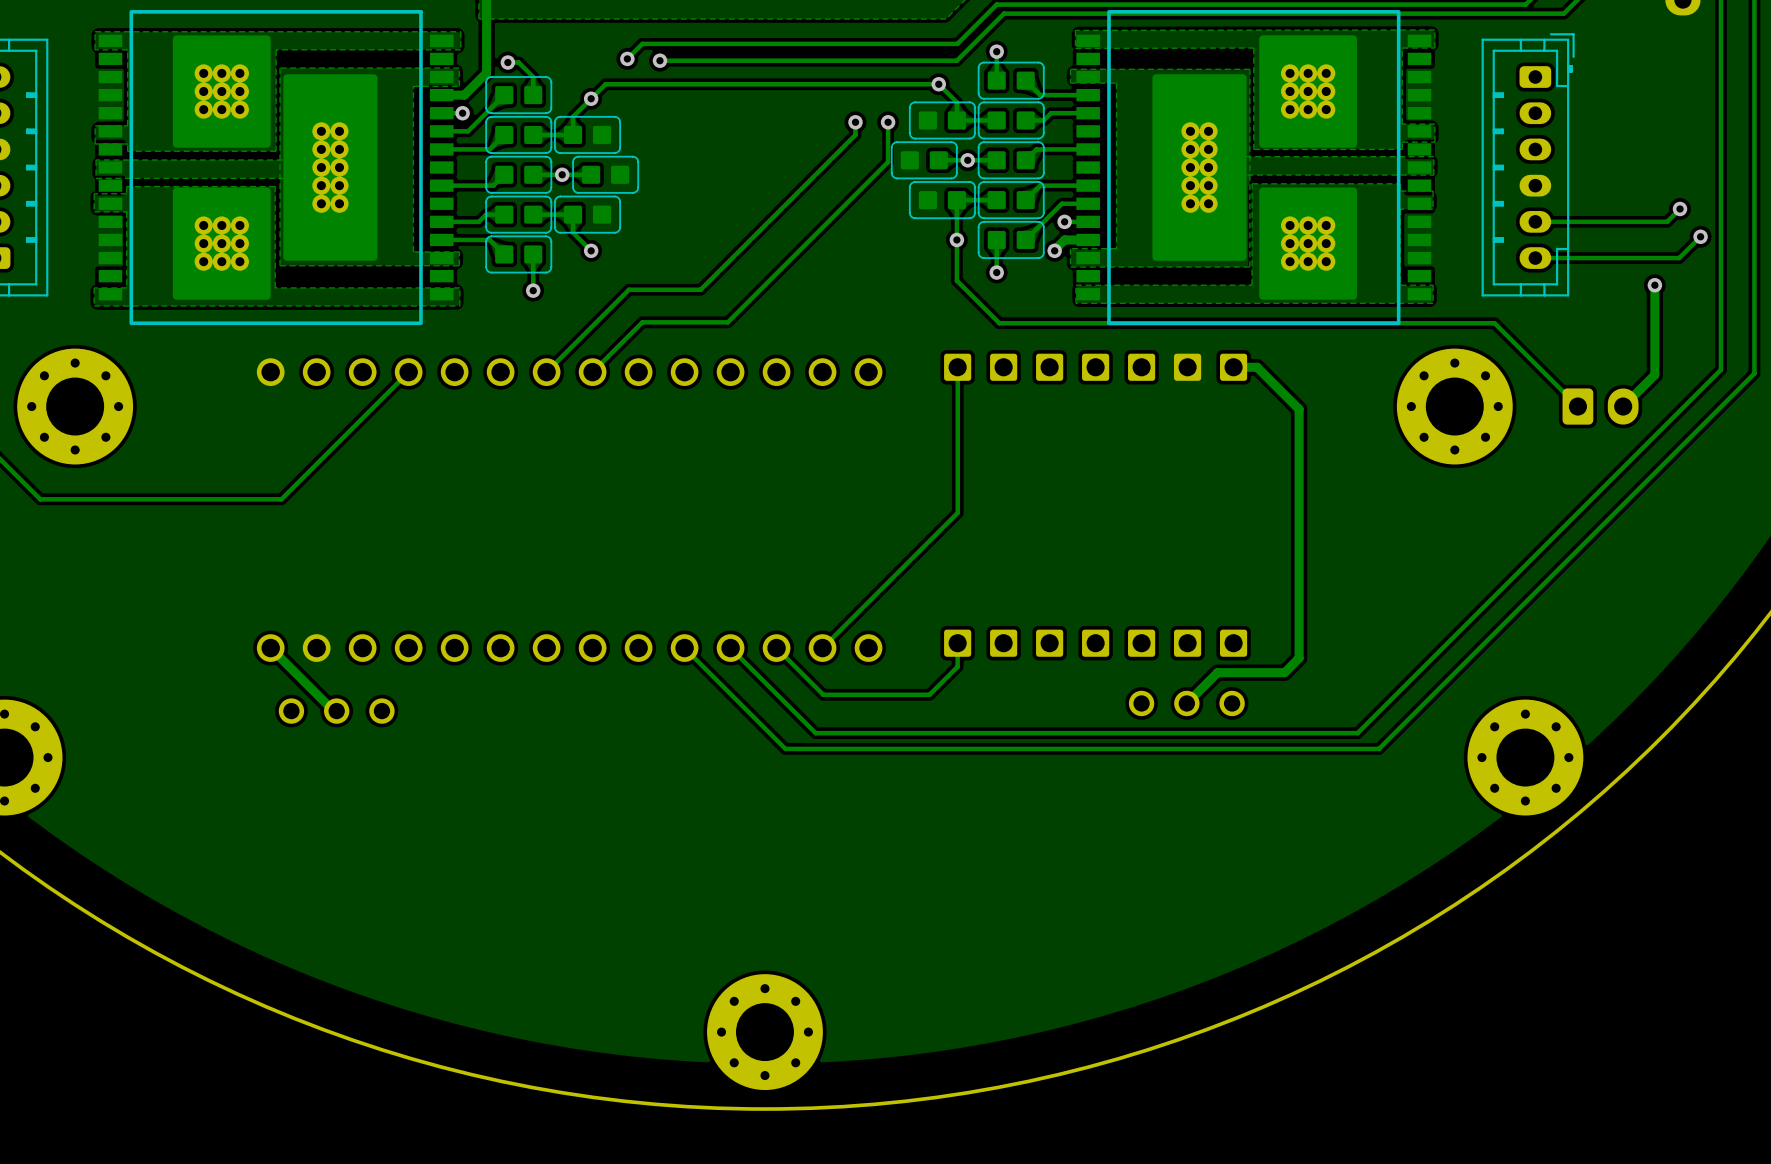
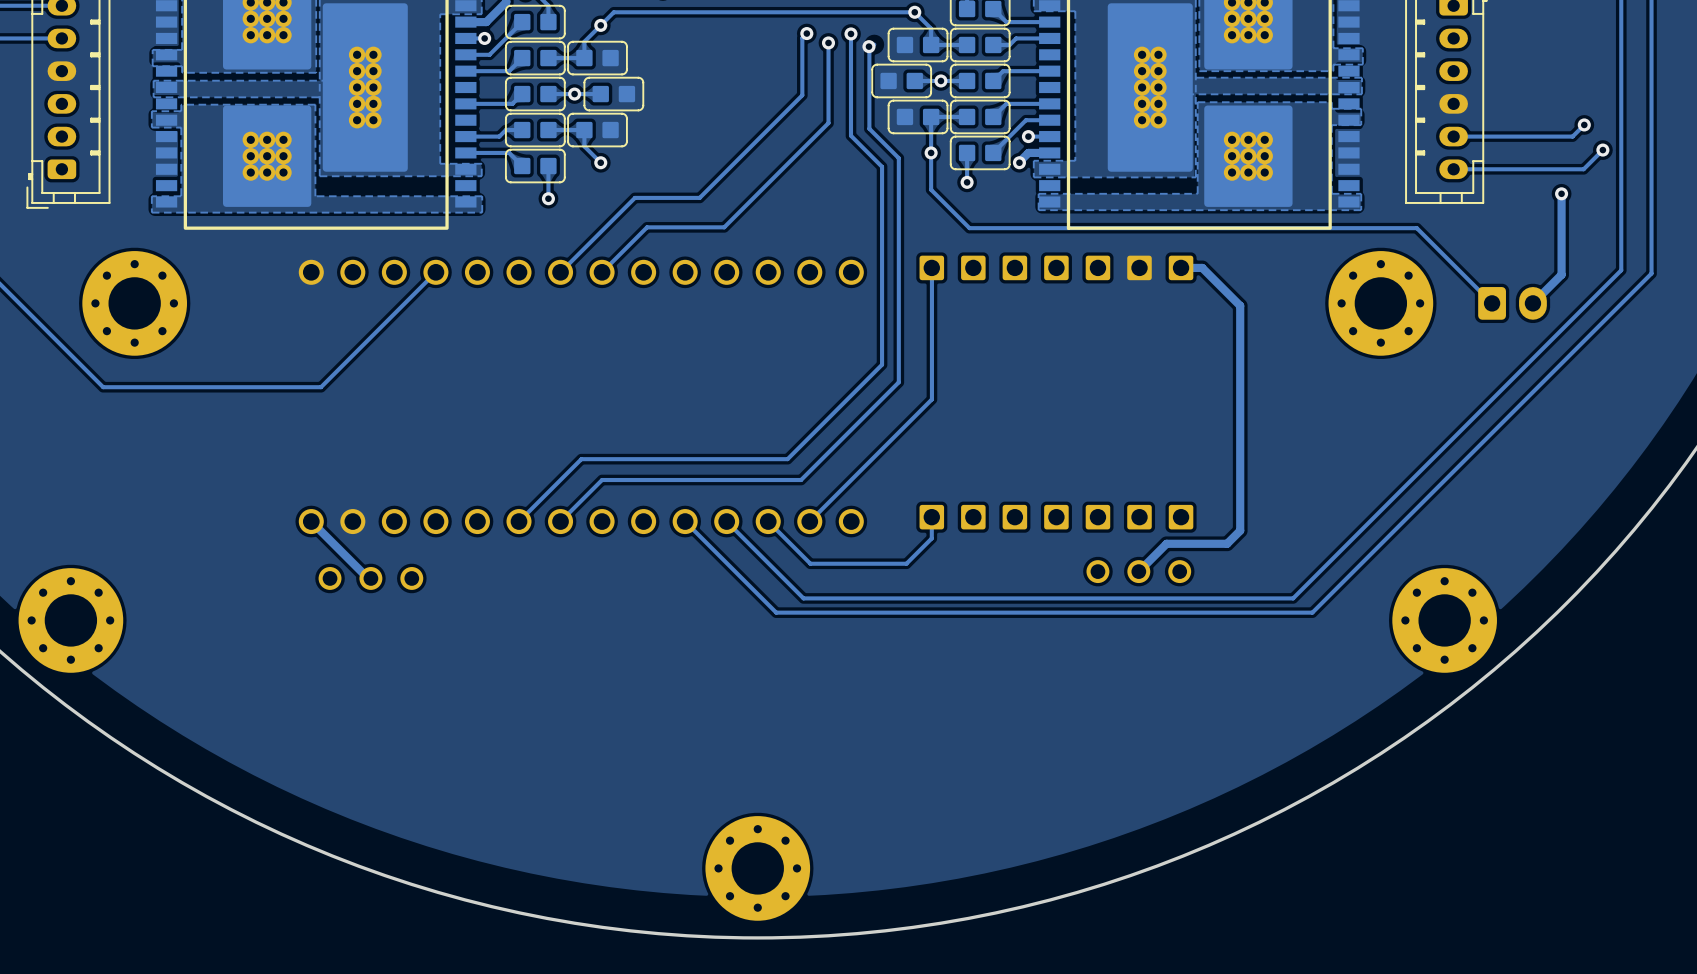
via: none -> (806, 33)
track: none -> (850, 33) (850, 135) (882, 166) (882, 364) (787, 459) (581, 459) (519, 521)
via: none -> (850, 33)
via: none -> (828, 42)
track: none -> (874, 44) (869, 49) (869, 128) (898, 158) (898, 382) (801, 480) (602, 480) (560, 521)
track: (855, 122) (855, 134) (814, 176) -> (806, 33) (802, 38) (802, 95)
via: (855, 122) -> none
track: (888, 122) (888, 162) (843, 206) -> (828, 42) (828, 123)

